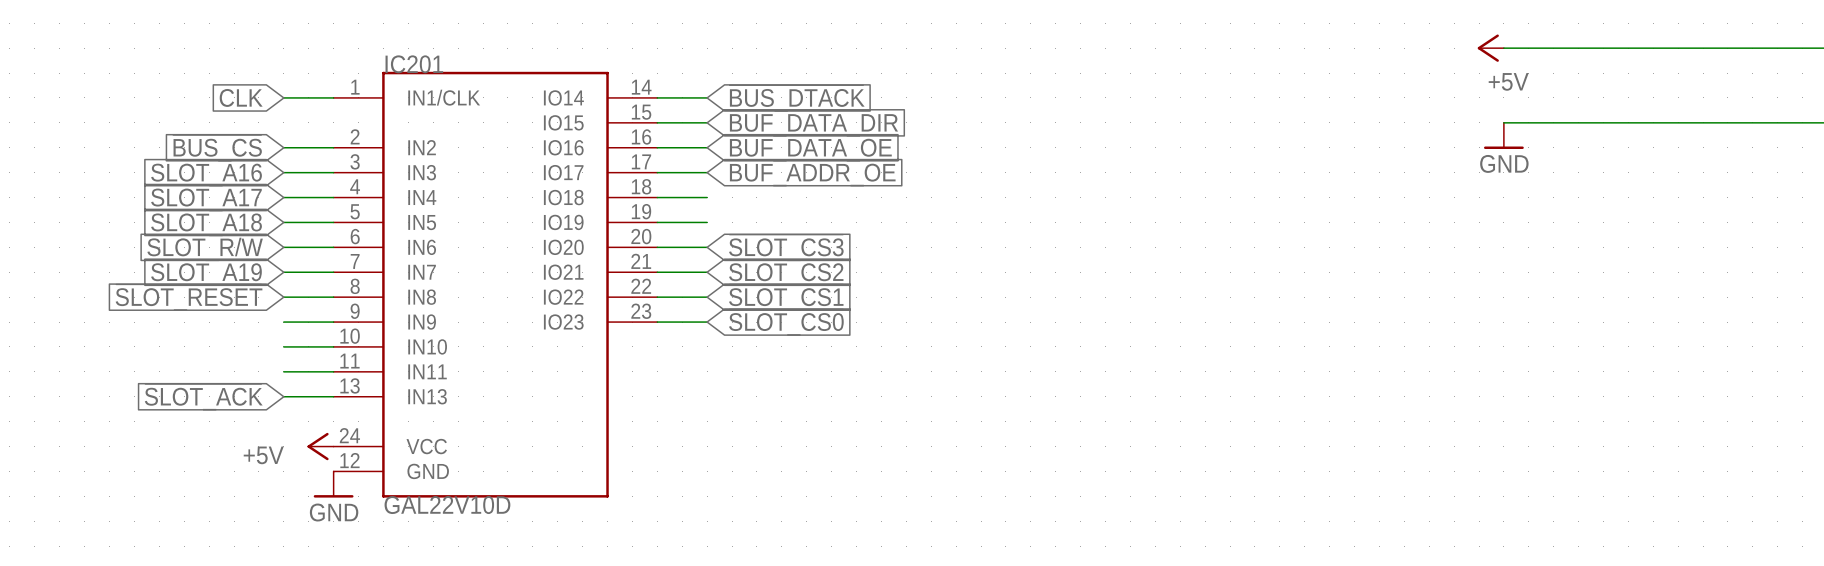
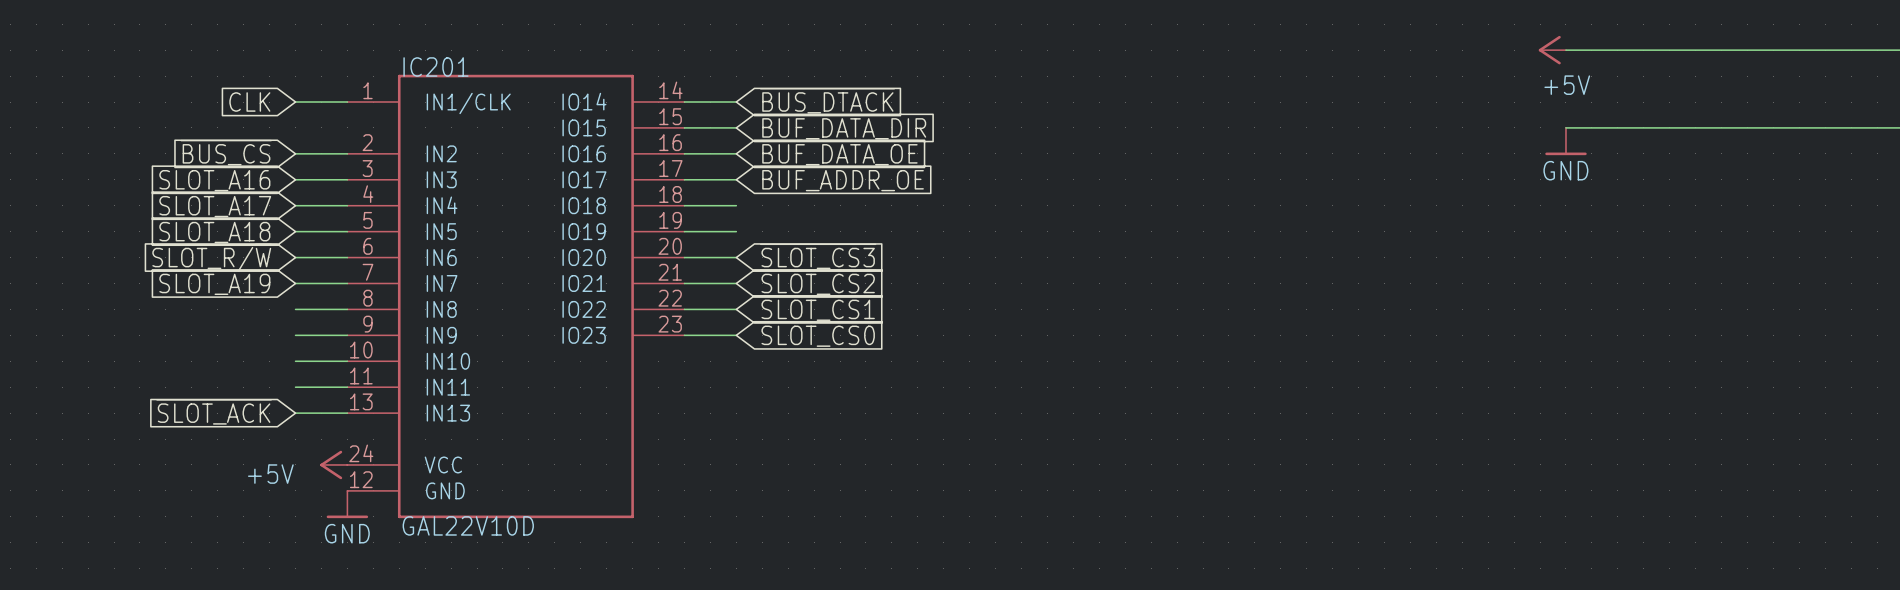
global label: ~{SLOT_RESET} (189, 297) -> none

